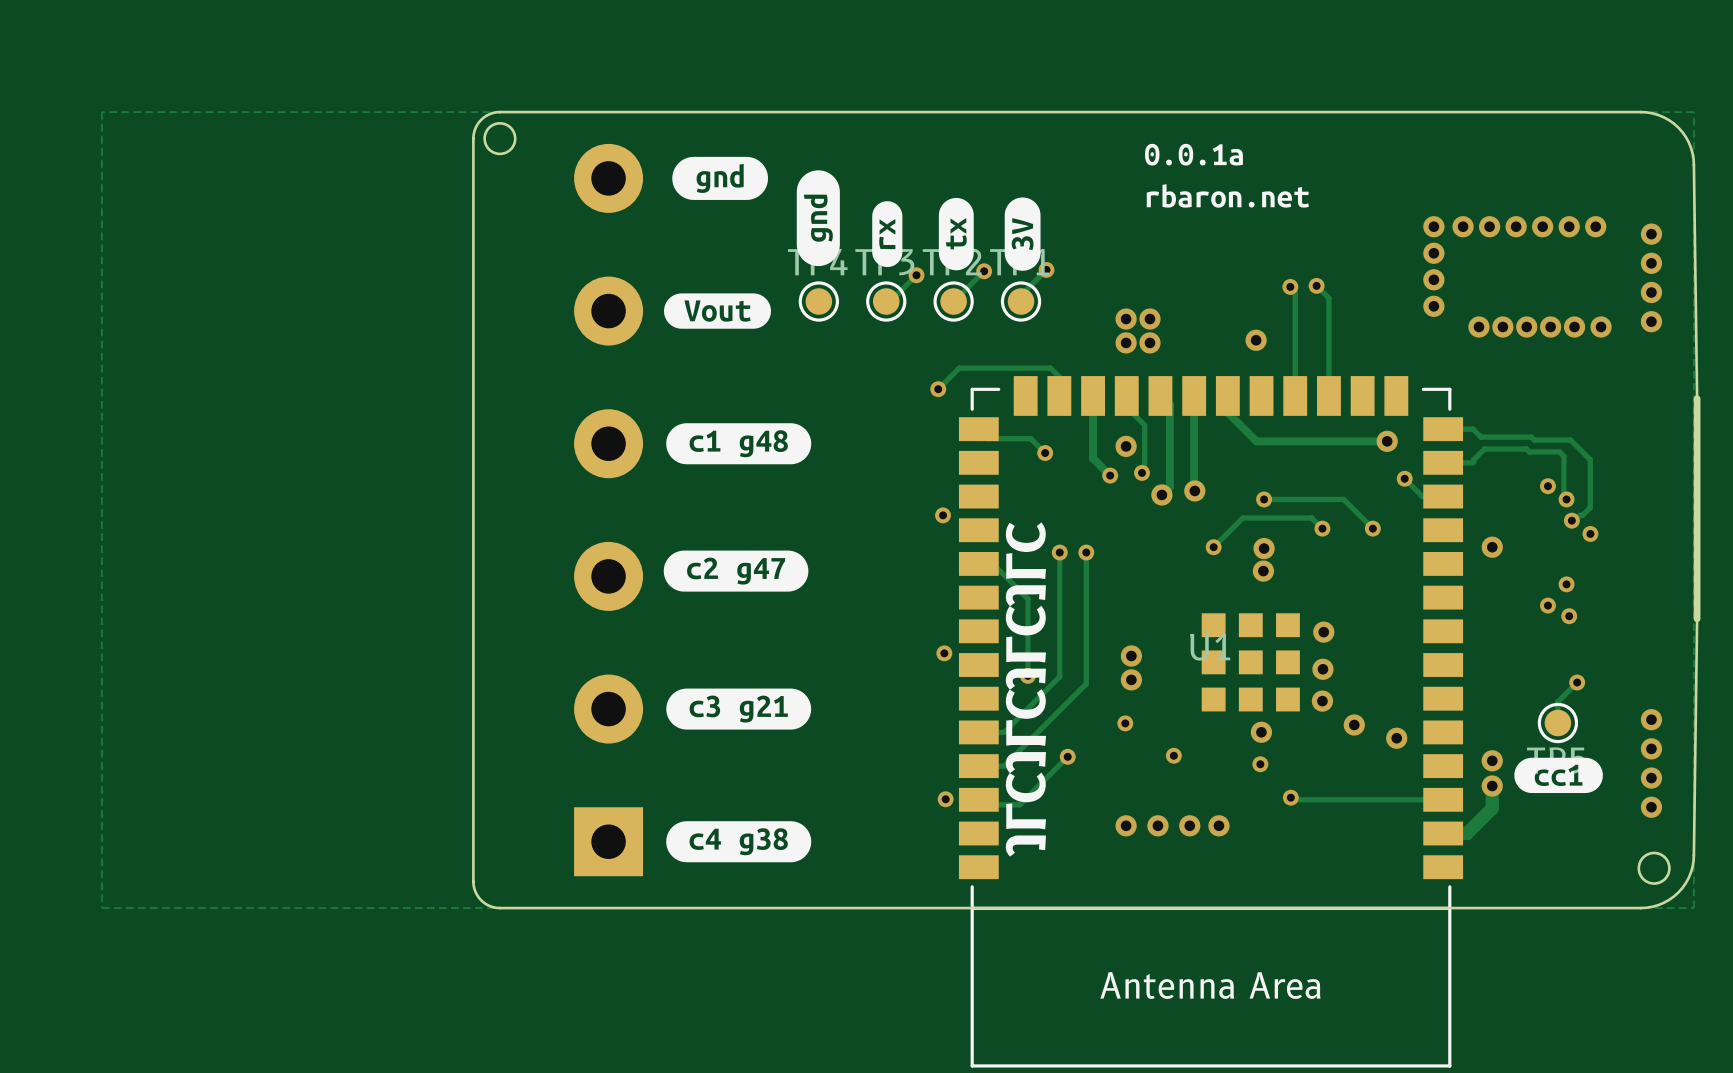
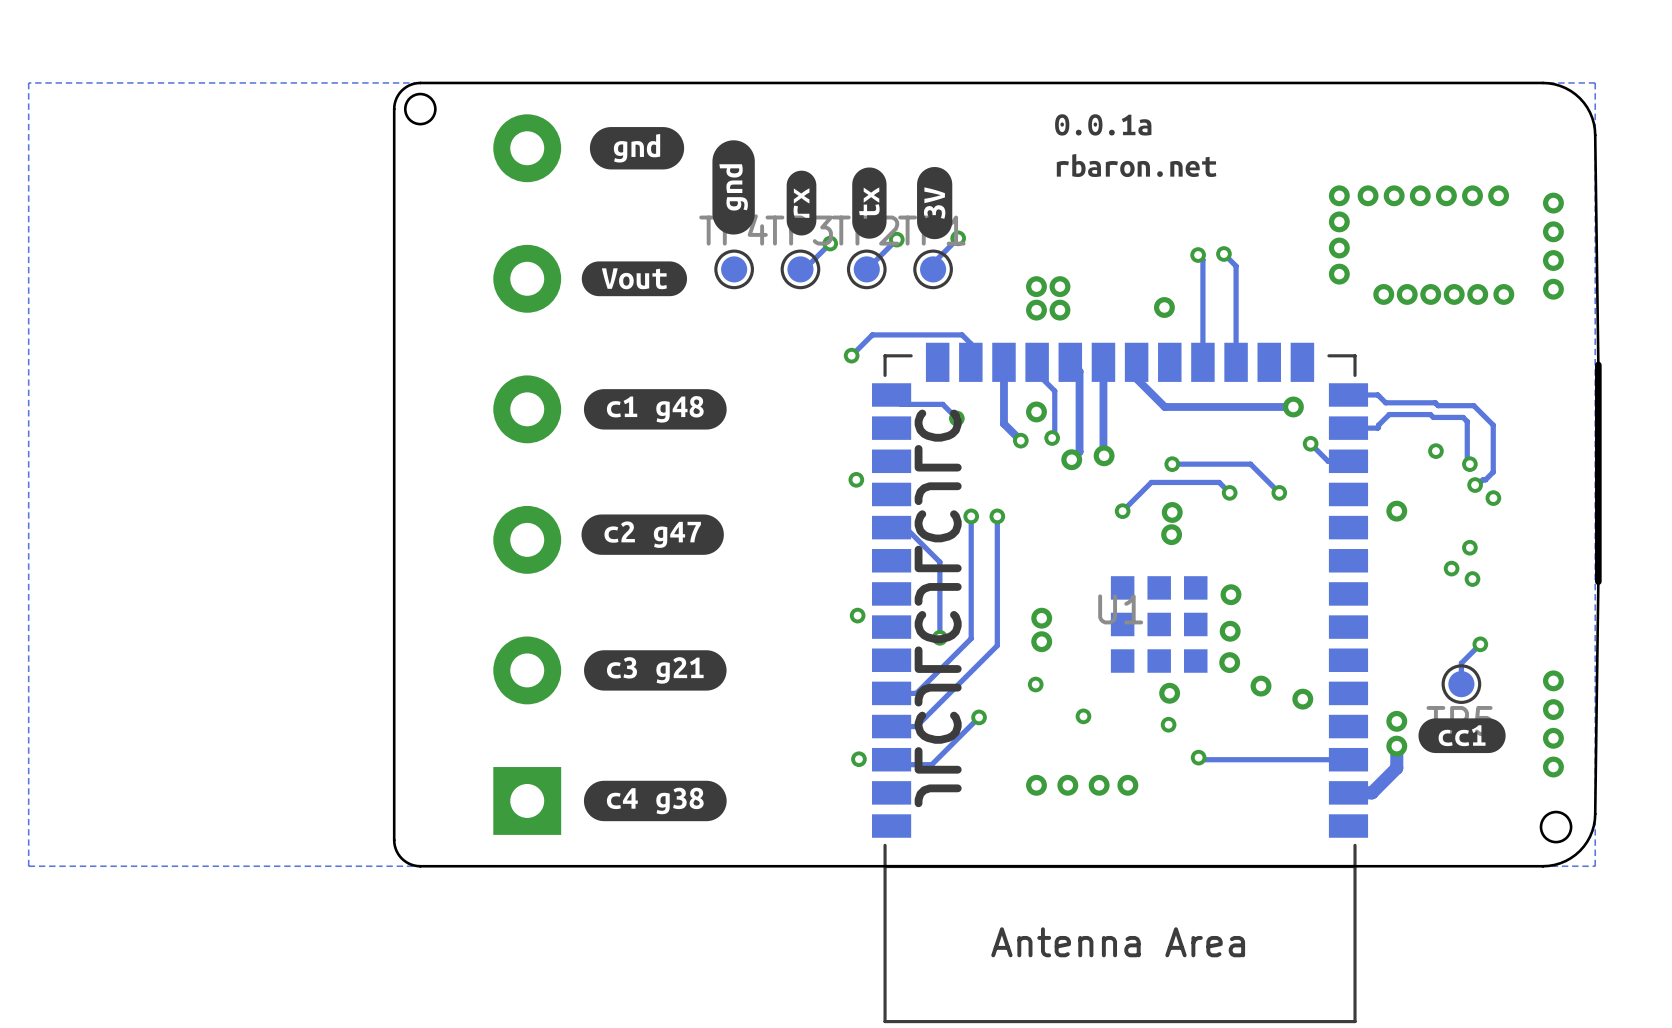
via position: (1547, 486) -> (1435, 451)

